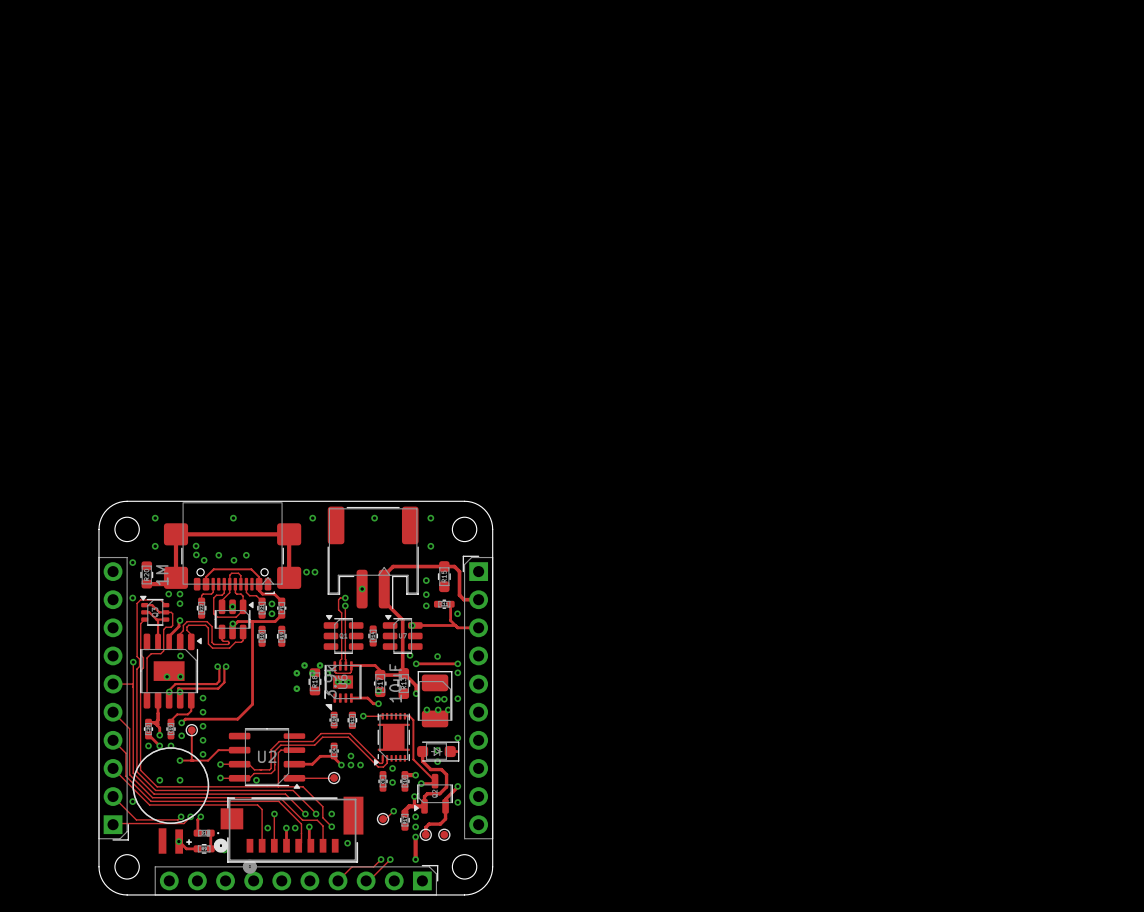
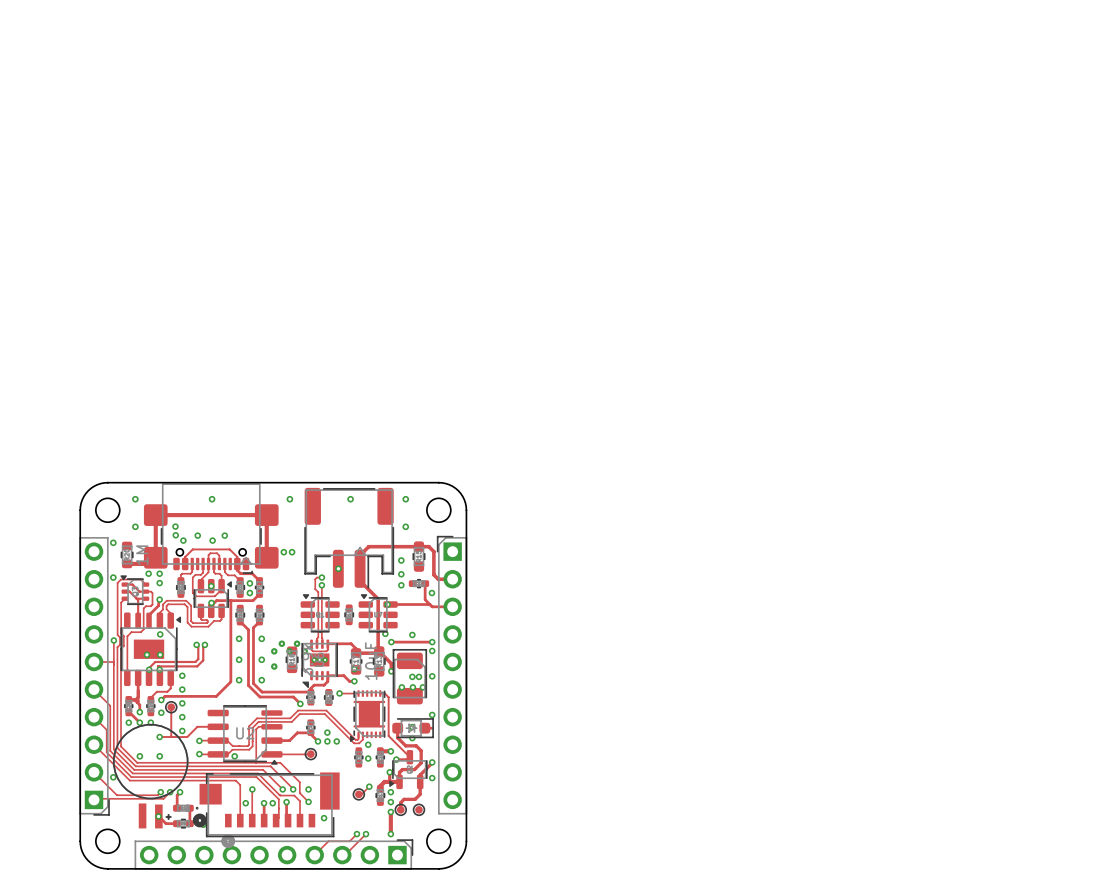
track: none -> (240, 621) (248, 629) (248, 685) (260, 697) (293, 697) (300, 703)
track: none -> (259, 621) (253, 627) (253, 683) (262, 692) (310, 692) (310, 688) (314, 685) (324, 685) (327, 681) (327, 675)
via: none -> (239, 638)
via: none -> (261, 638)
via: none -> (239, 659)
via: none -> (261, 659)
via: none -> (239, 680)
via: none -> (261, 680)
via: none -> (300, 703)

